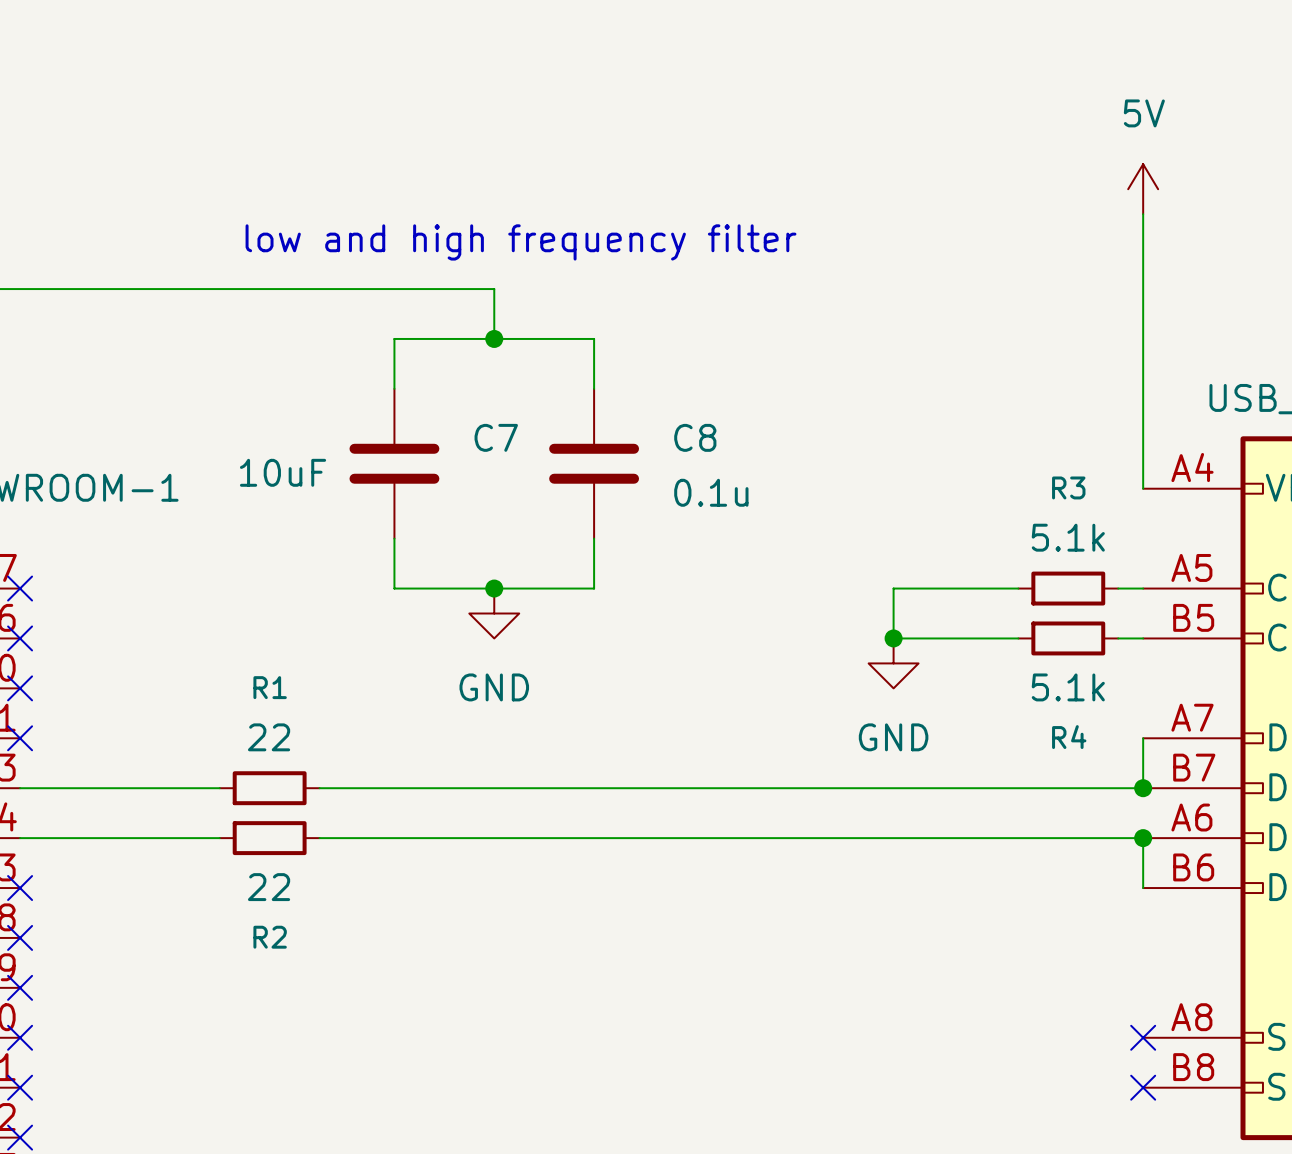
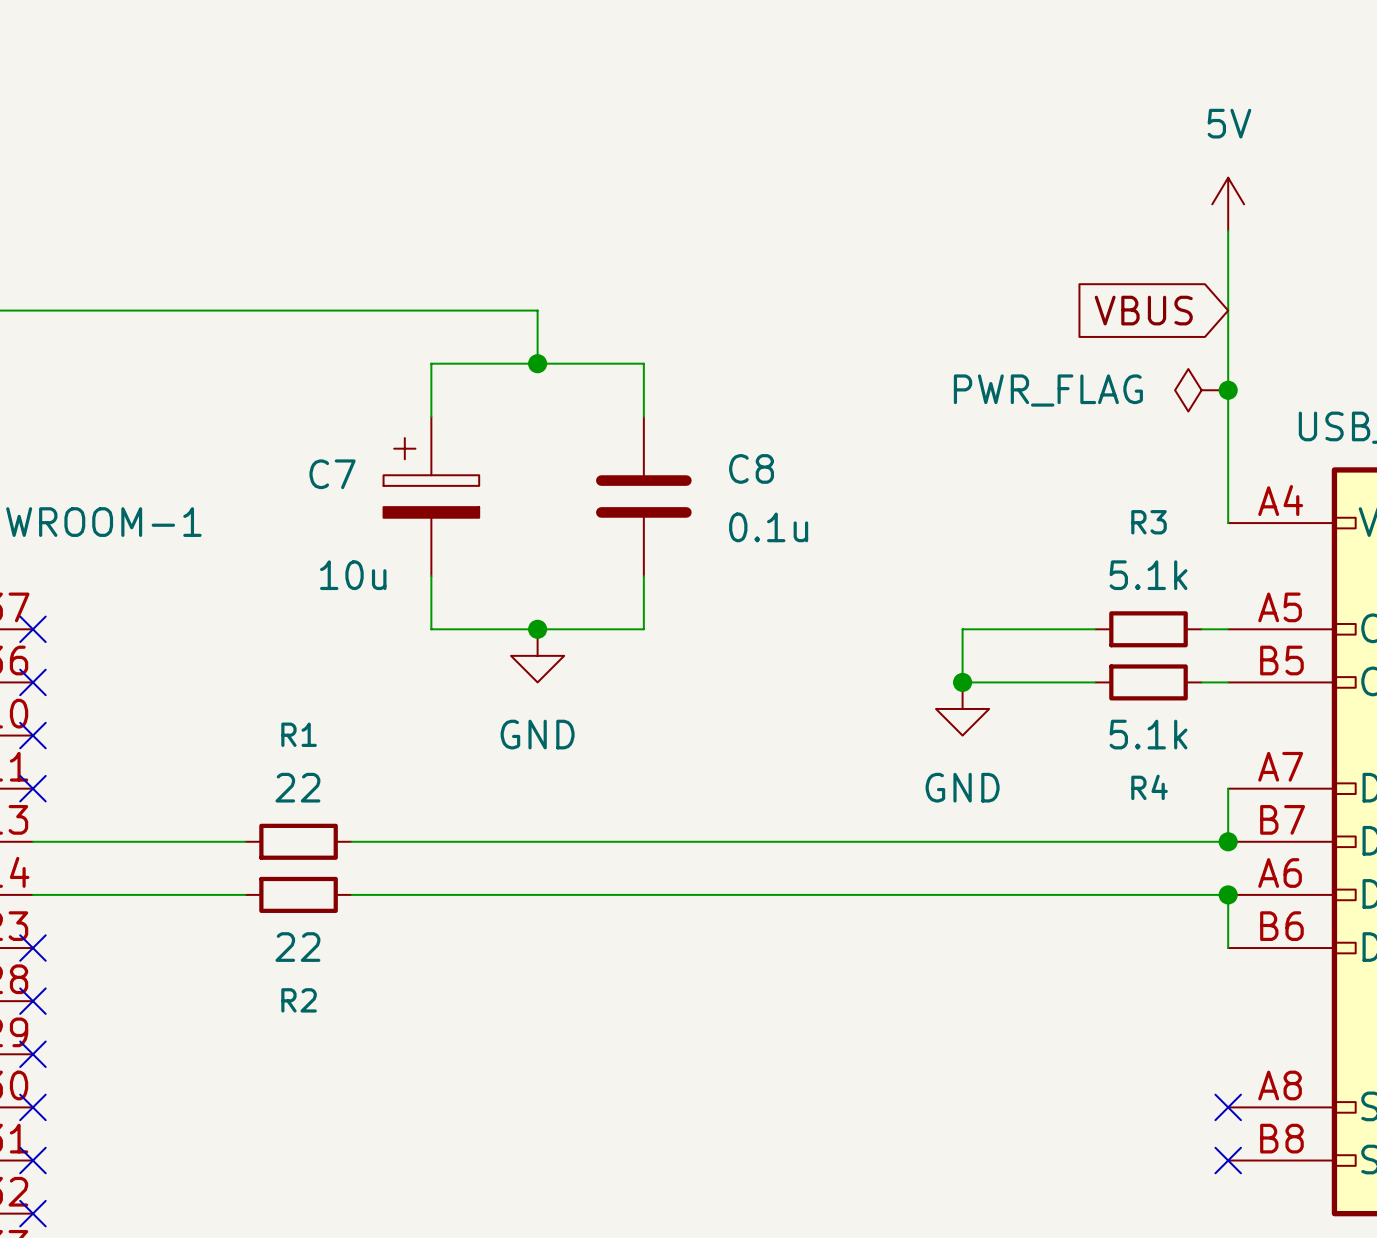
text: low and high frequency filter (521, 242) -> none
global label: none -> VBUS (1143, 310)
power symbol: none -> PWR_FLAG (1201, 390)
junction: none -> (1228, 390)
C7 symbol: [349, 388, 440, 539] -> [383, 416, 480, 577]
C7 name position: C7 (496, 437) -> C7 (332, 474)
C7 value: 10uF (283, 472) -> 10u (353, 575)

